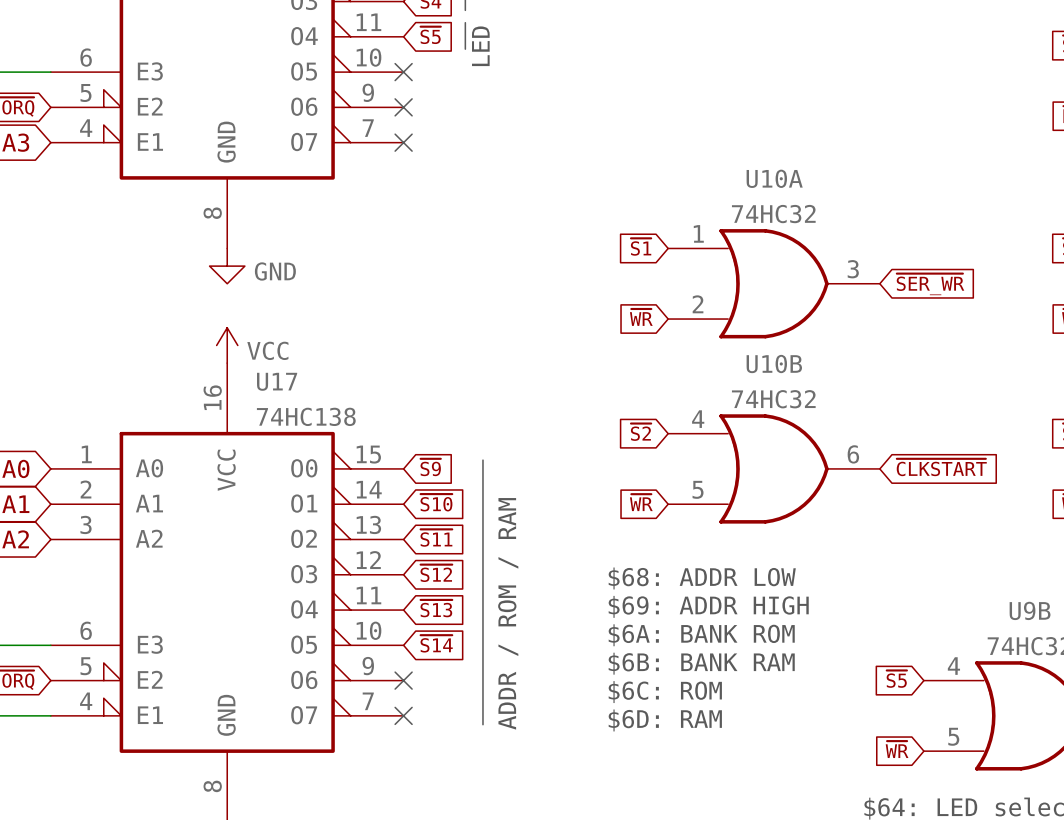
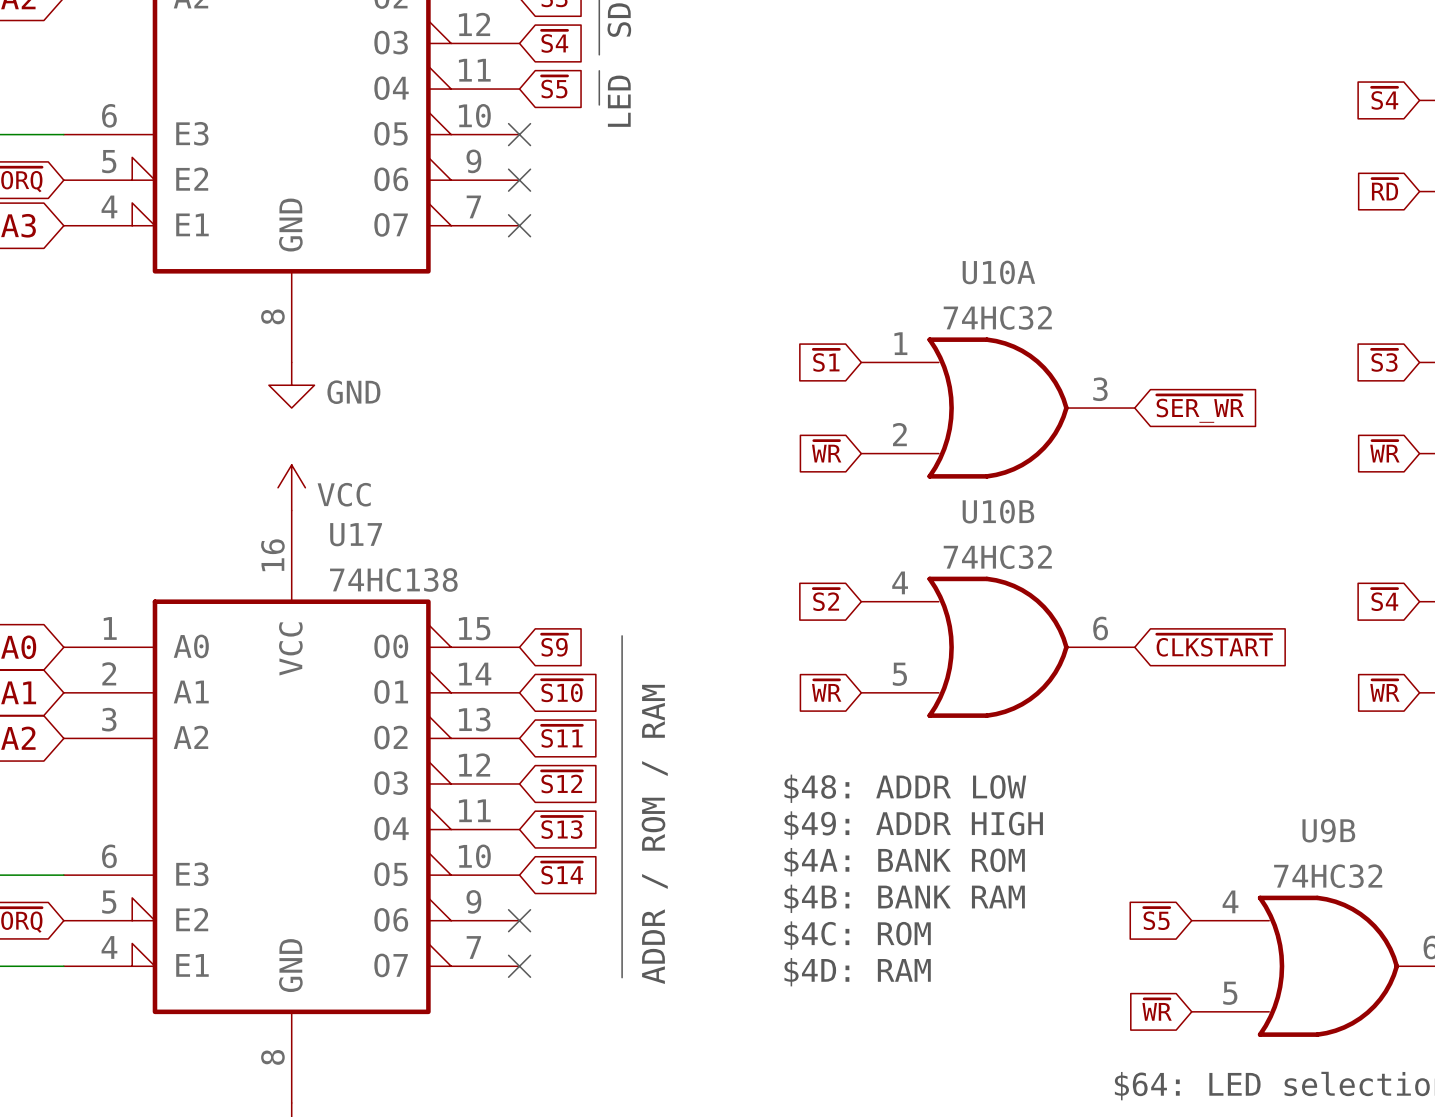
text: $68: ADDR LOW (702, 578) -> $48: ADDR LOW (905, 788)
text: $69: ADDR HIGH (708, 606) -> $49: ADDR HIGH (913, 825)
text: $6A: BANK ROM (701, 635) -> $4A: BANK ROM (904, 862)
text: $6B: BANK RAM (701, 663) -> $4B: BANK RAM (904, 898)
text: $6C: ROM (665, 692) -> $4C: ROM (857, 935)
text: $6D: RAM (665, 720) -> $4D: RAM (857, 972)

